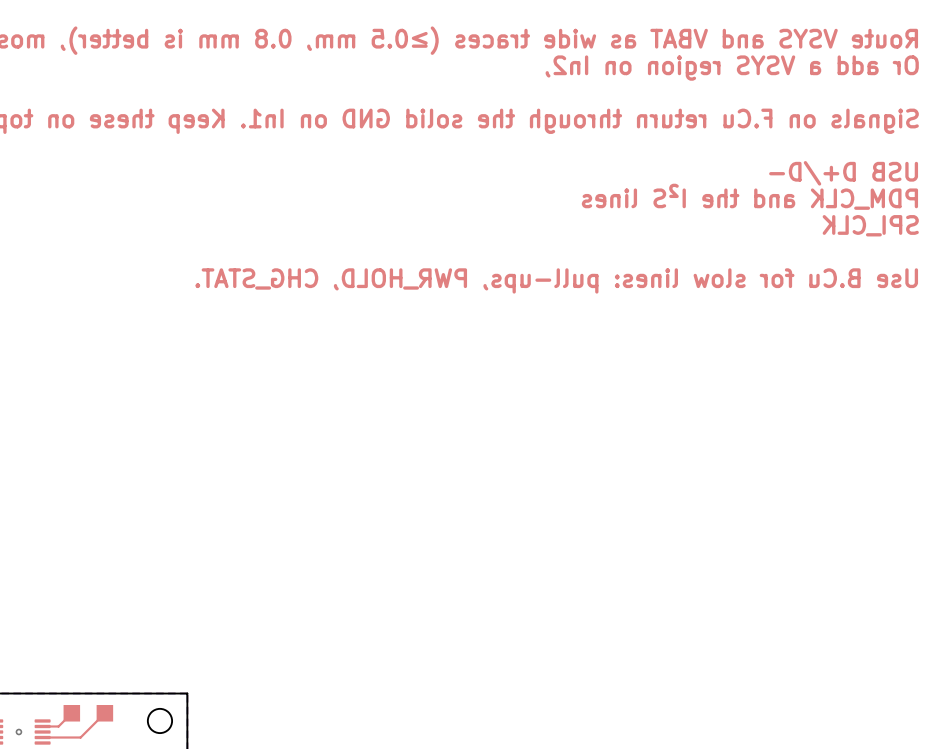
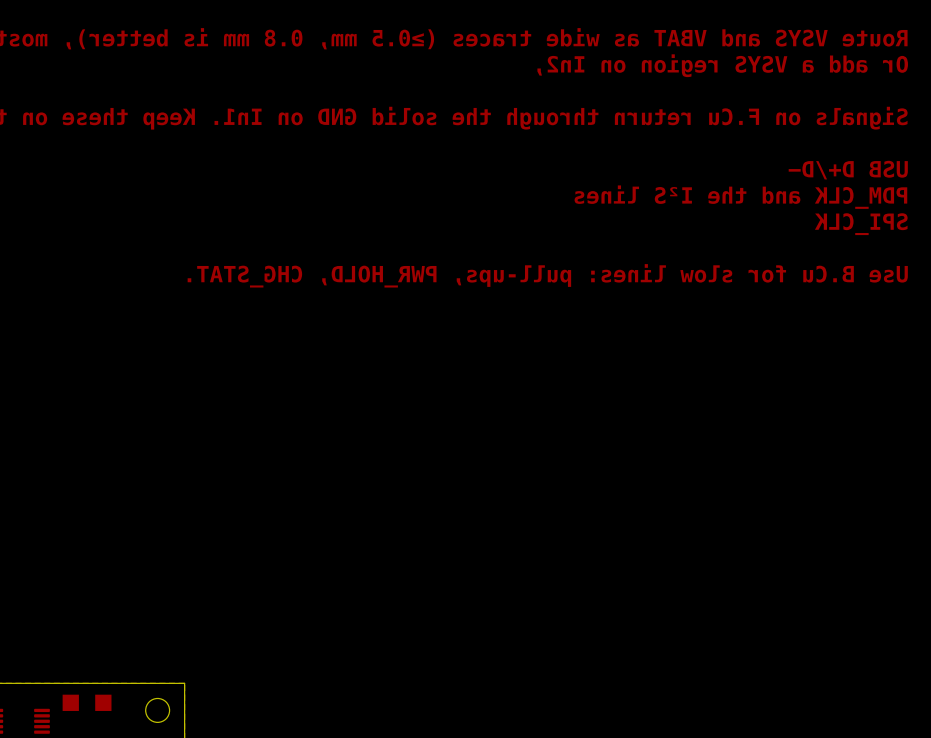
top track: (71, 713) (58, 726) (42, 726) -> none
top track: (104, 713) (80, 737) (42, 737) -> none
via: (18, 732) -> none

